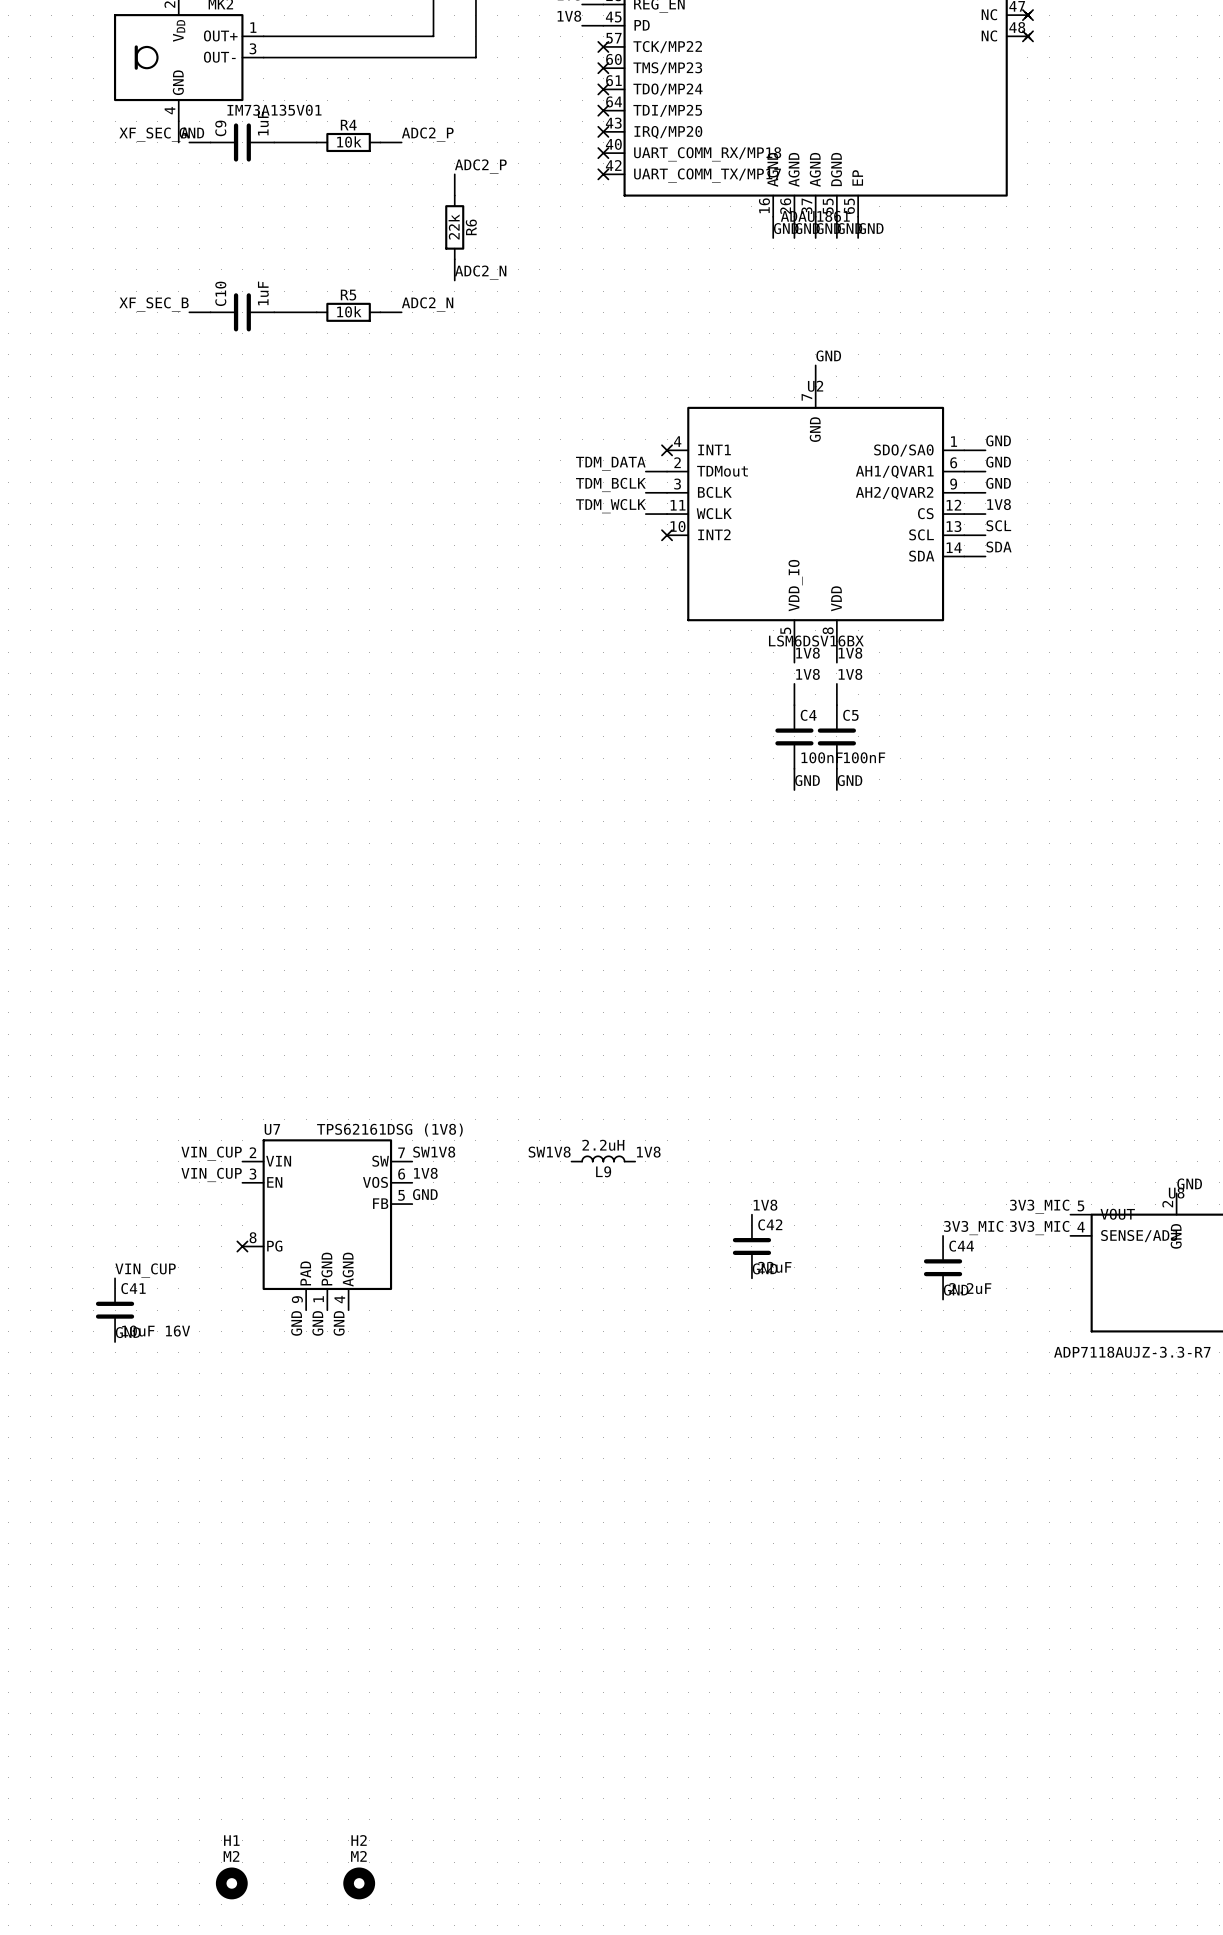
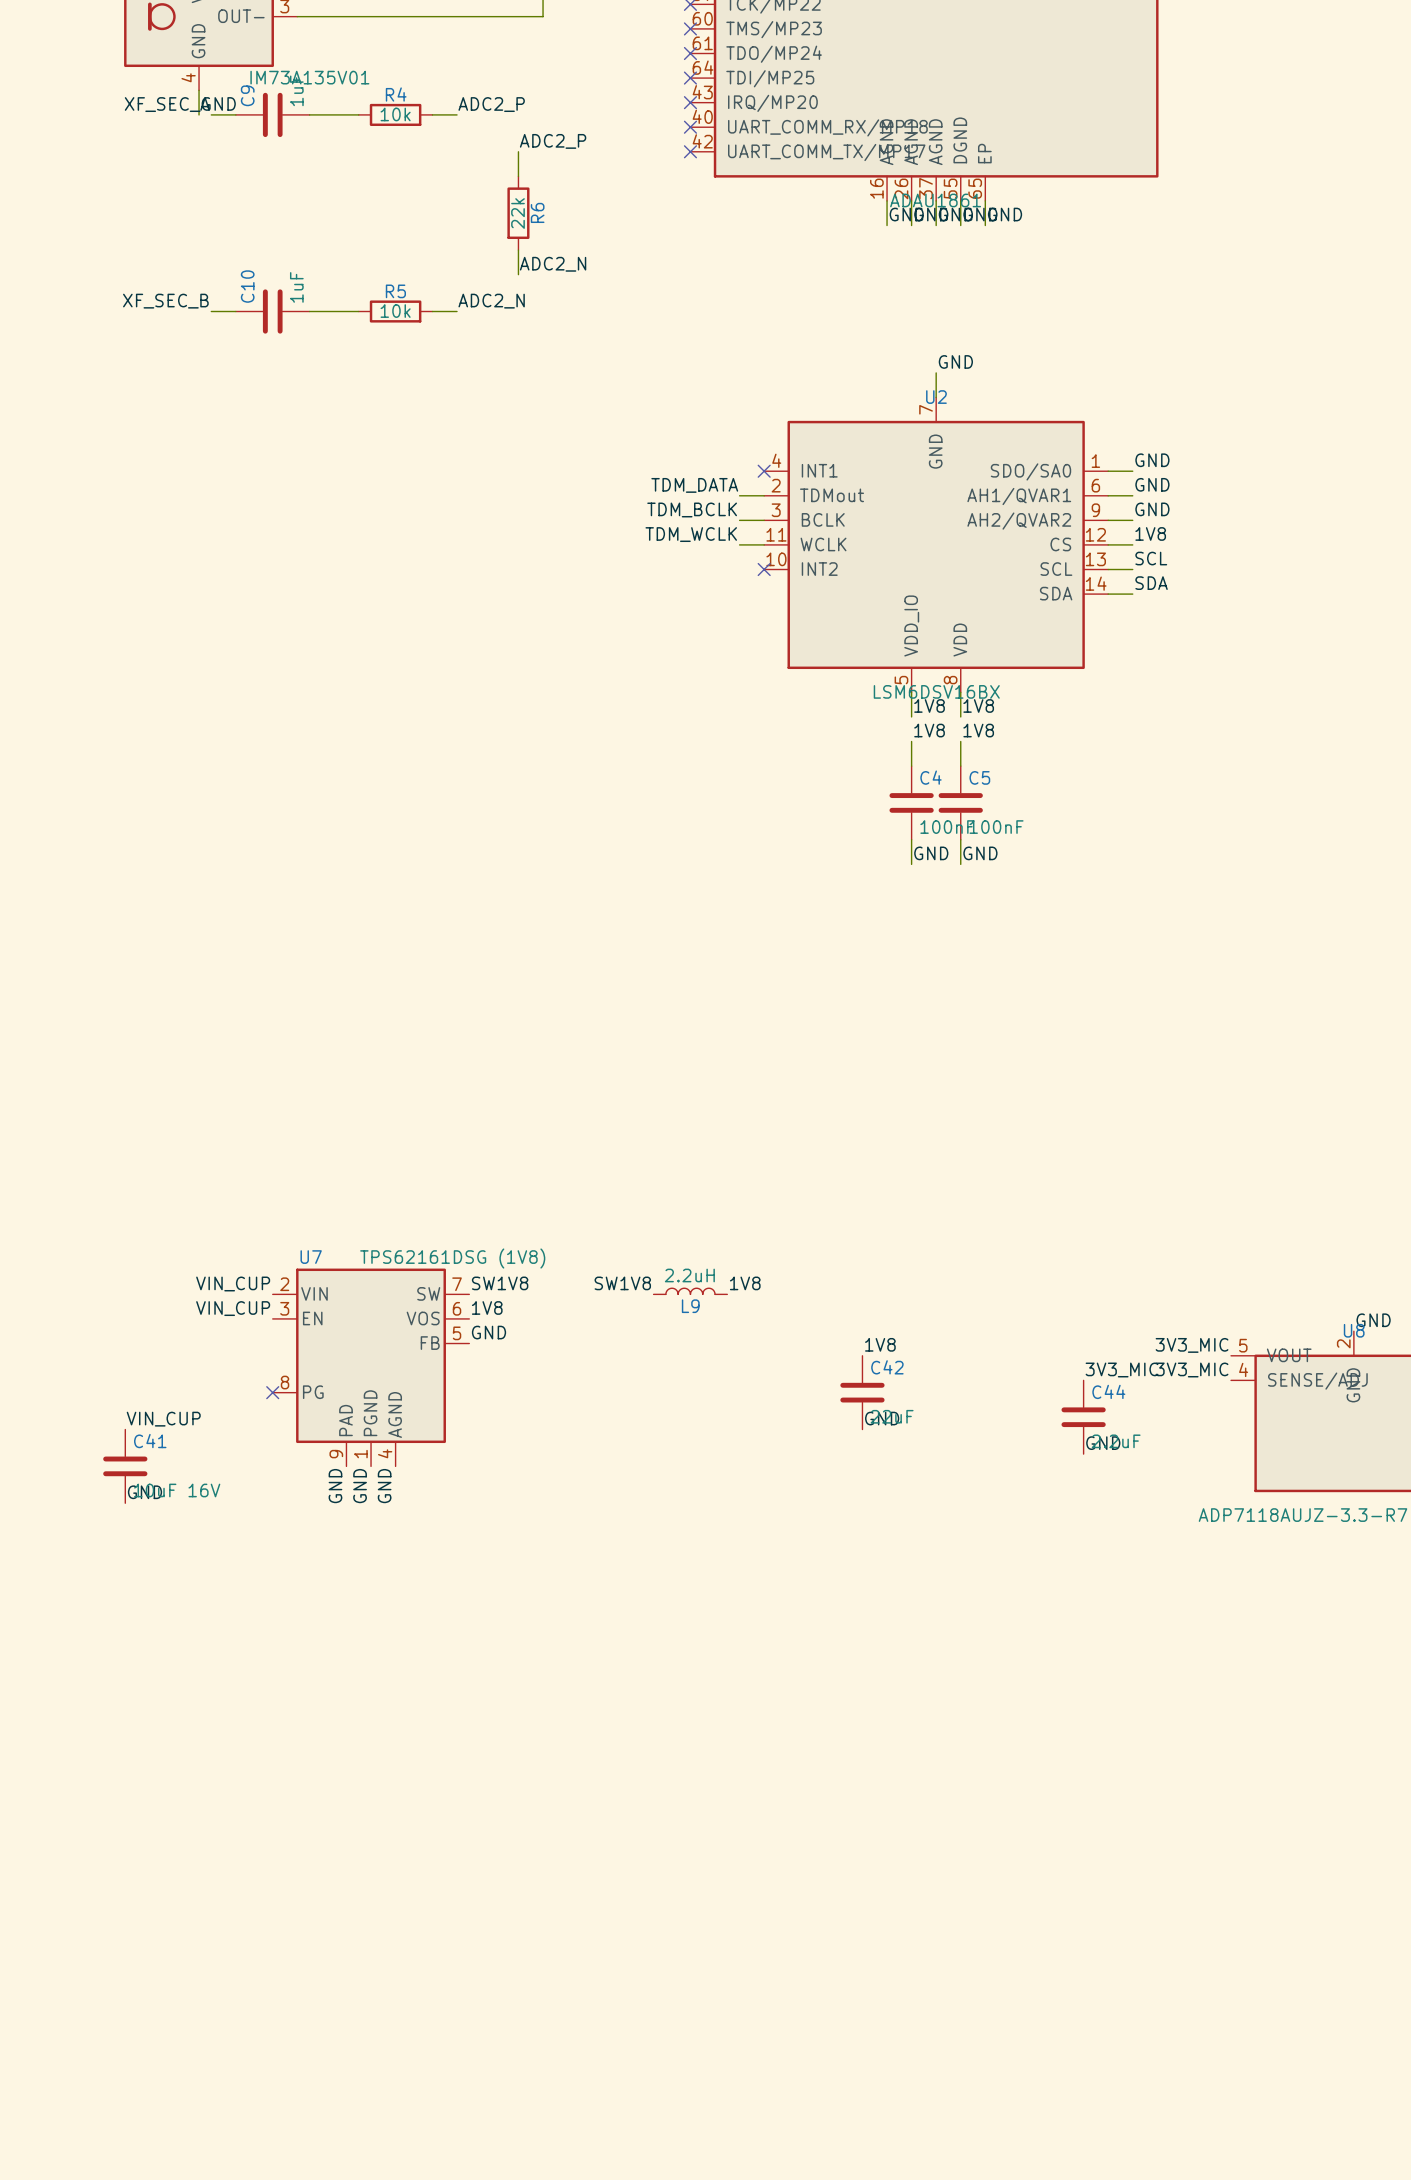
H1: M2 (231, 1883) -> none
H2: M2 (359, 1883) -> none

